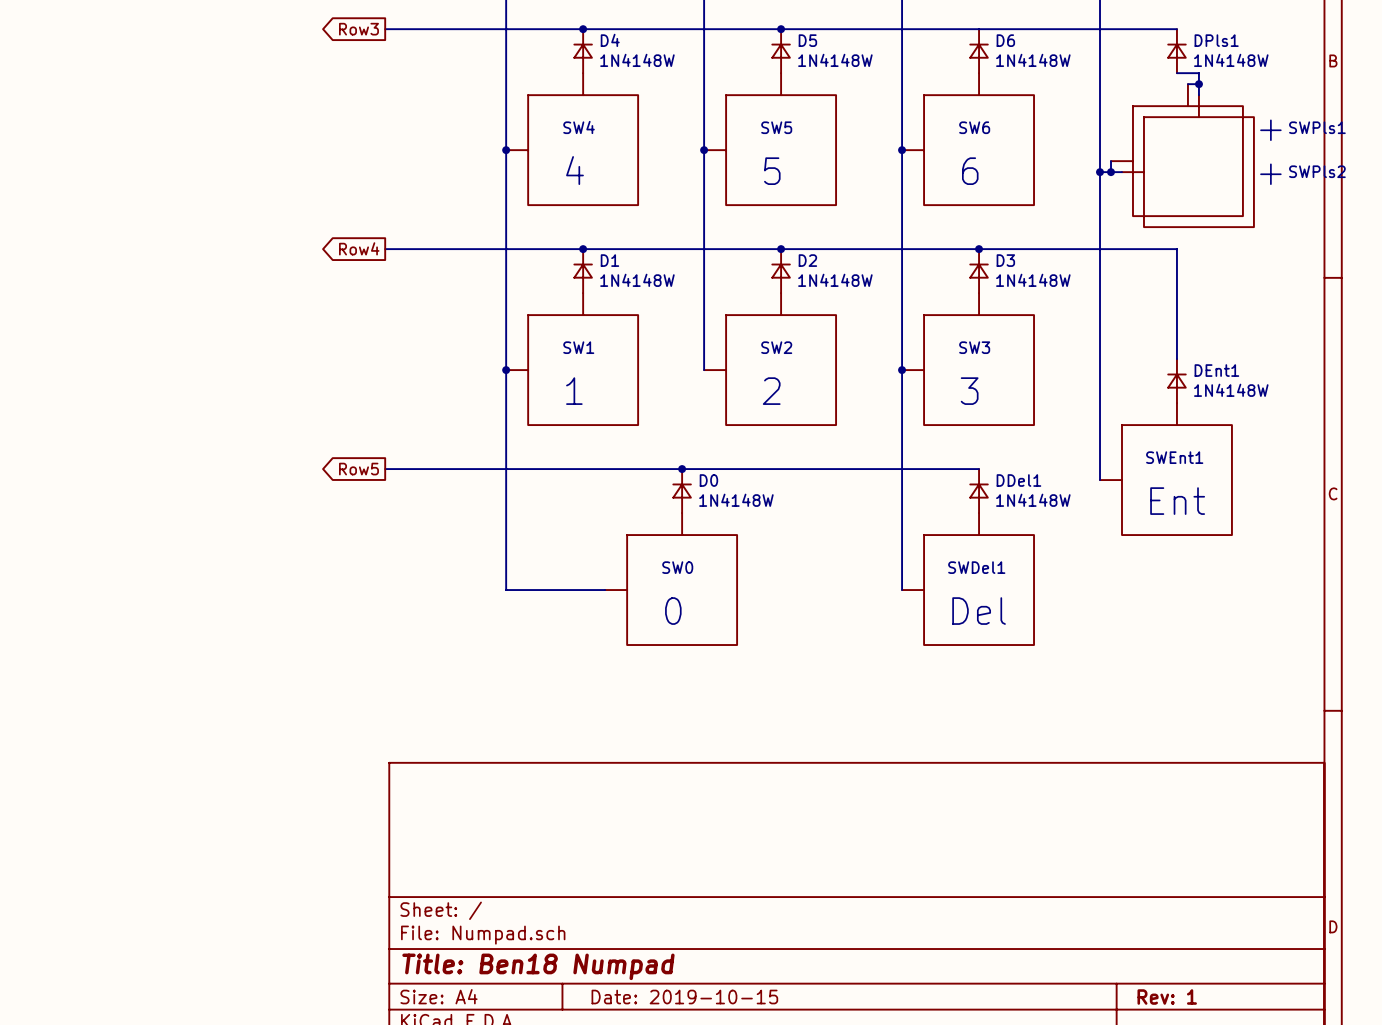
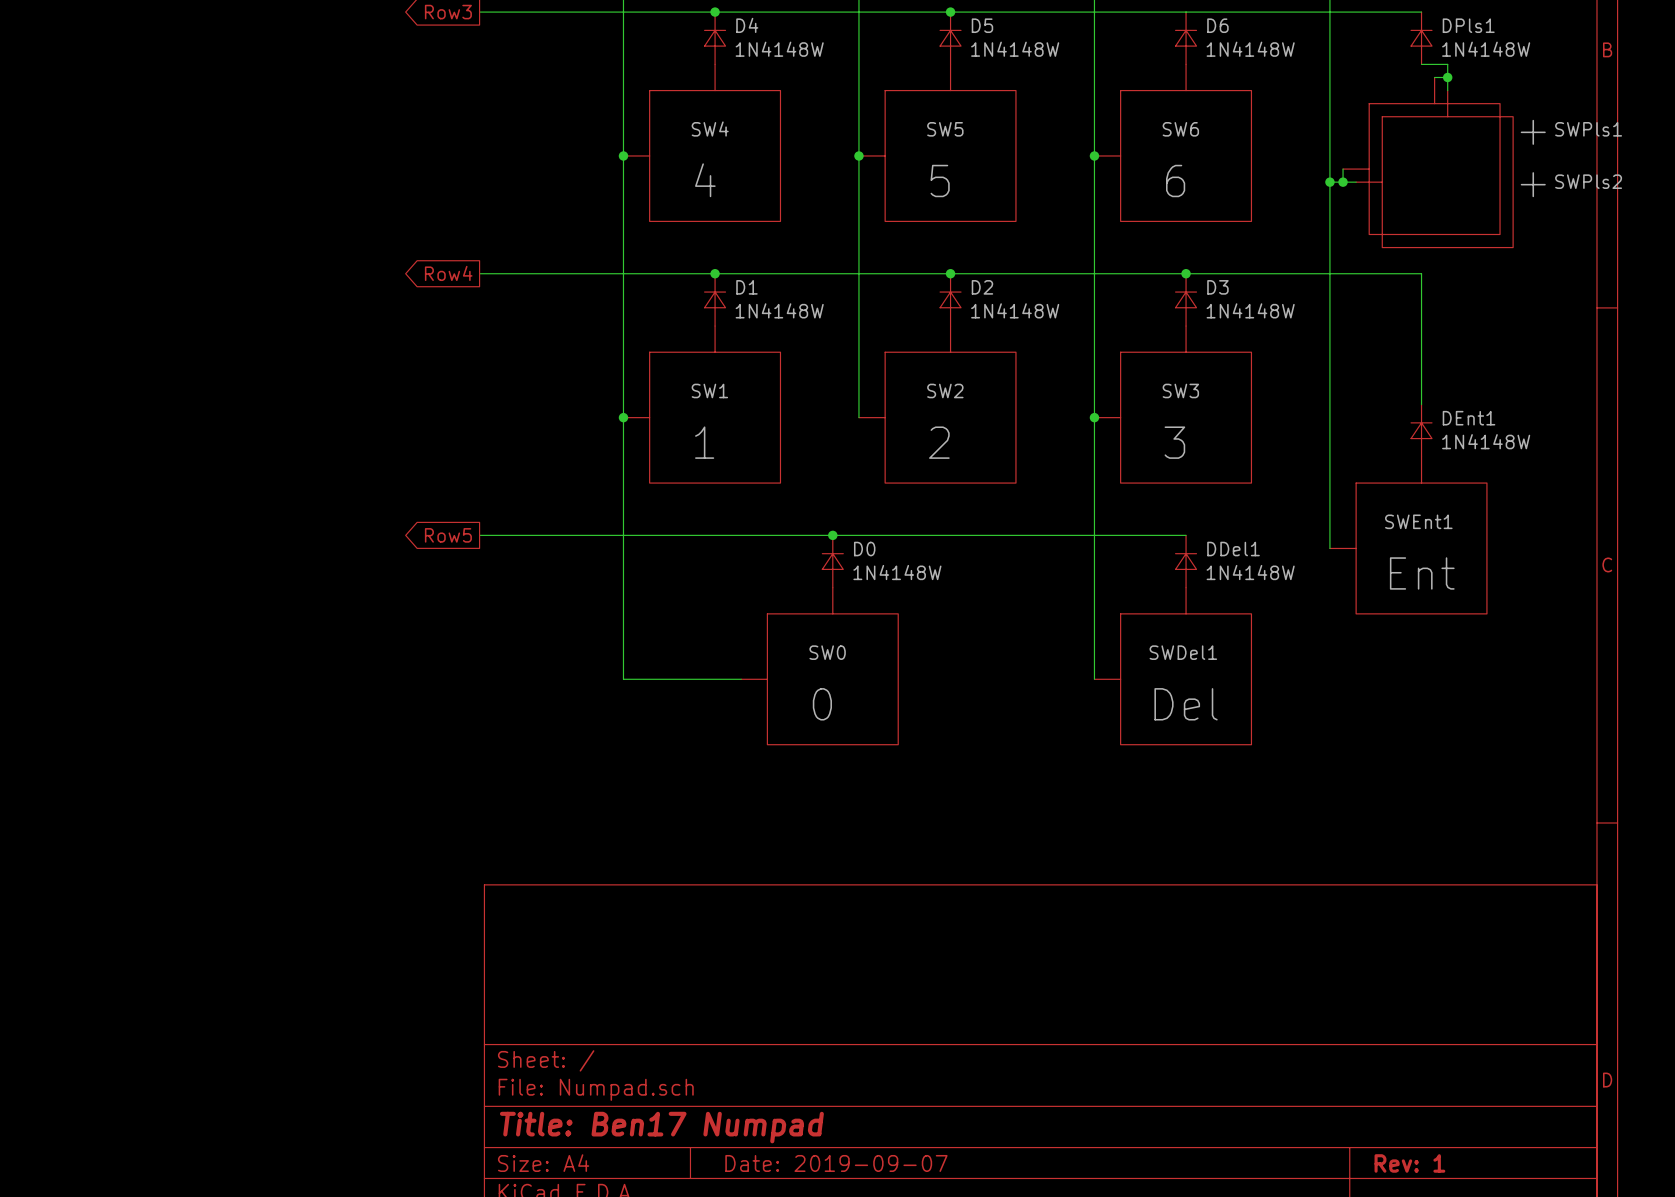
title block: Title: Ben18 Numpad (538, 966) -> Title: Ben17 Numpad (661, 1127)
title block: Date: 2019-10-15 (684, 997) -> Date: 2019-09-07 (836, 1163)

